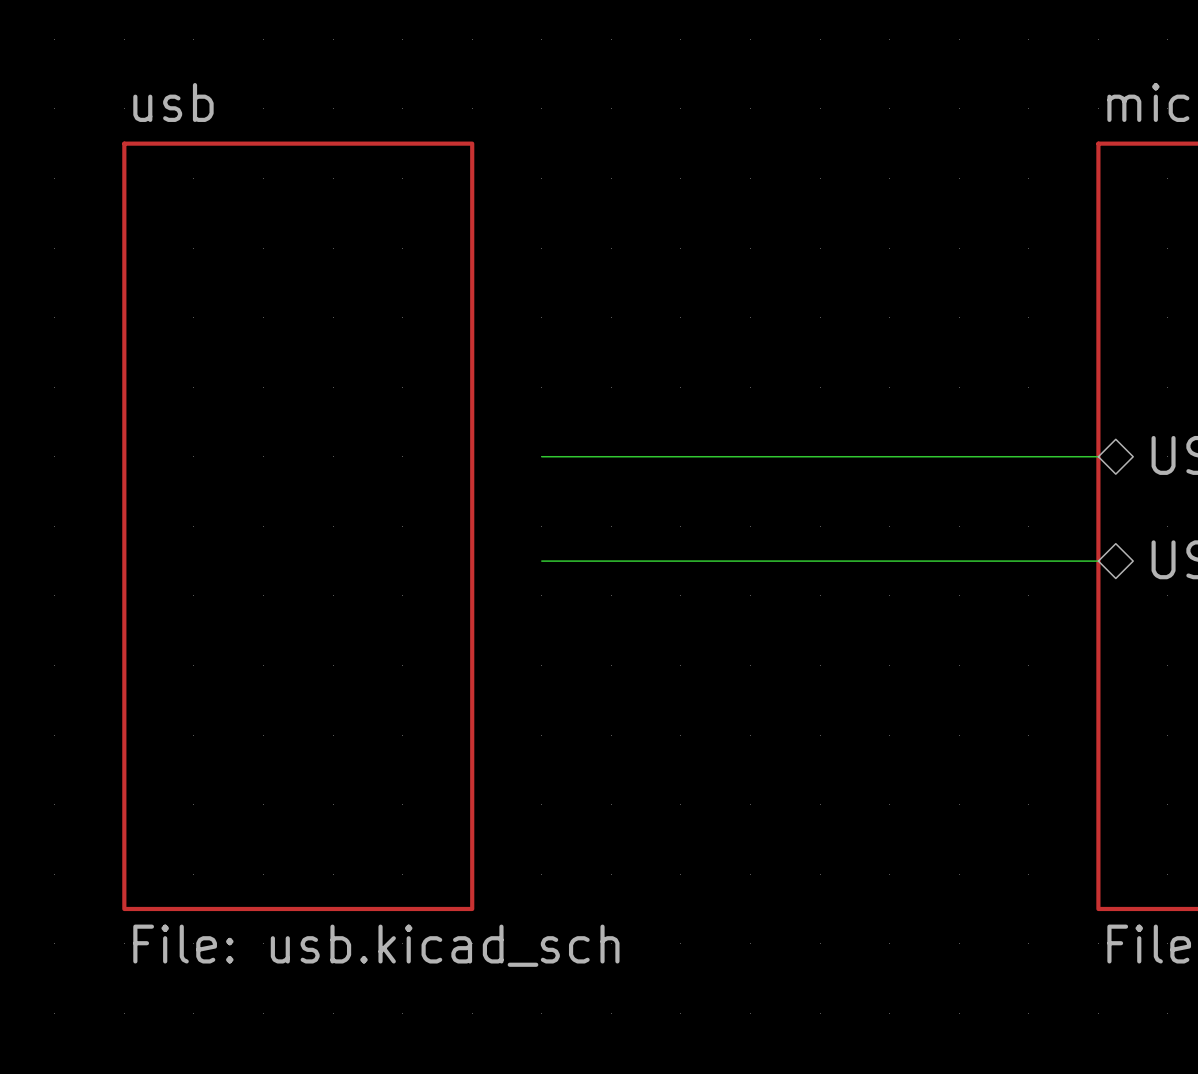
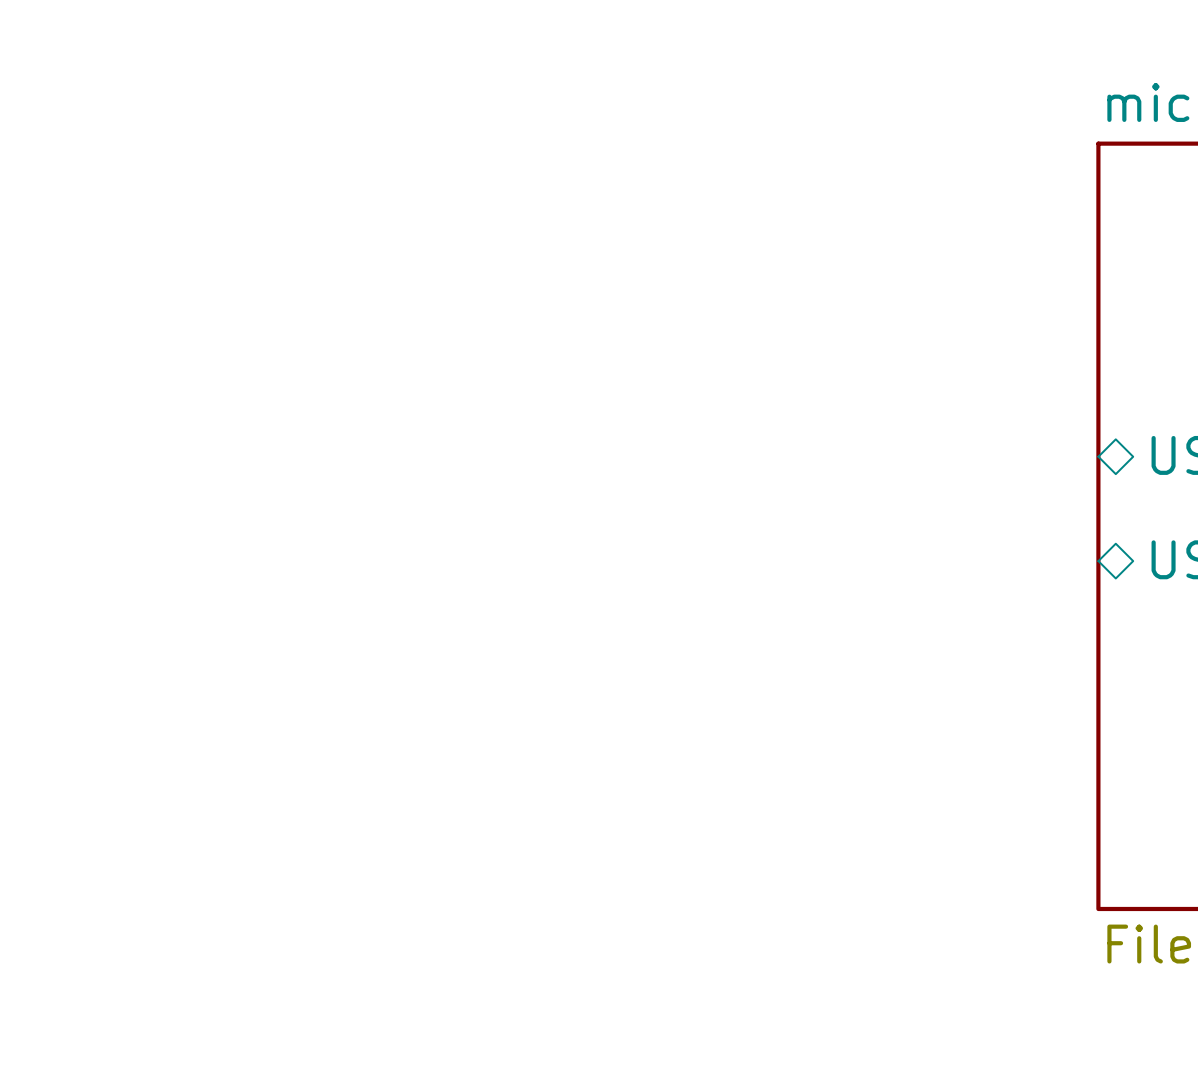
wire: (541, 456) (1098, 456) -> none
sheet usb: File: usb.kicad_sch (298, 526) -> none
wire: (541, 561) (1098, 561) -> none

